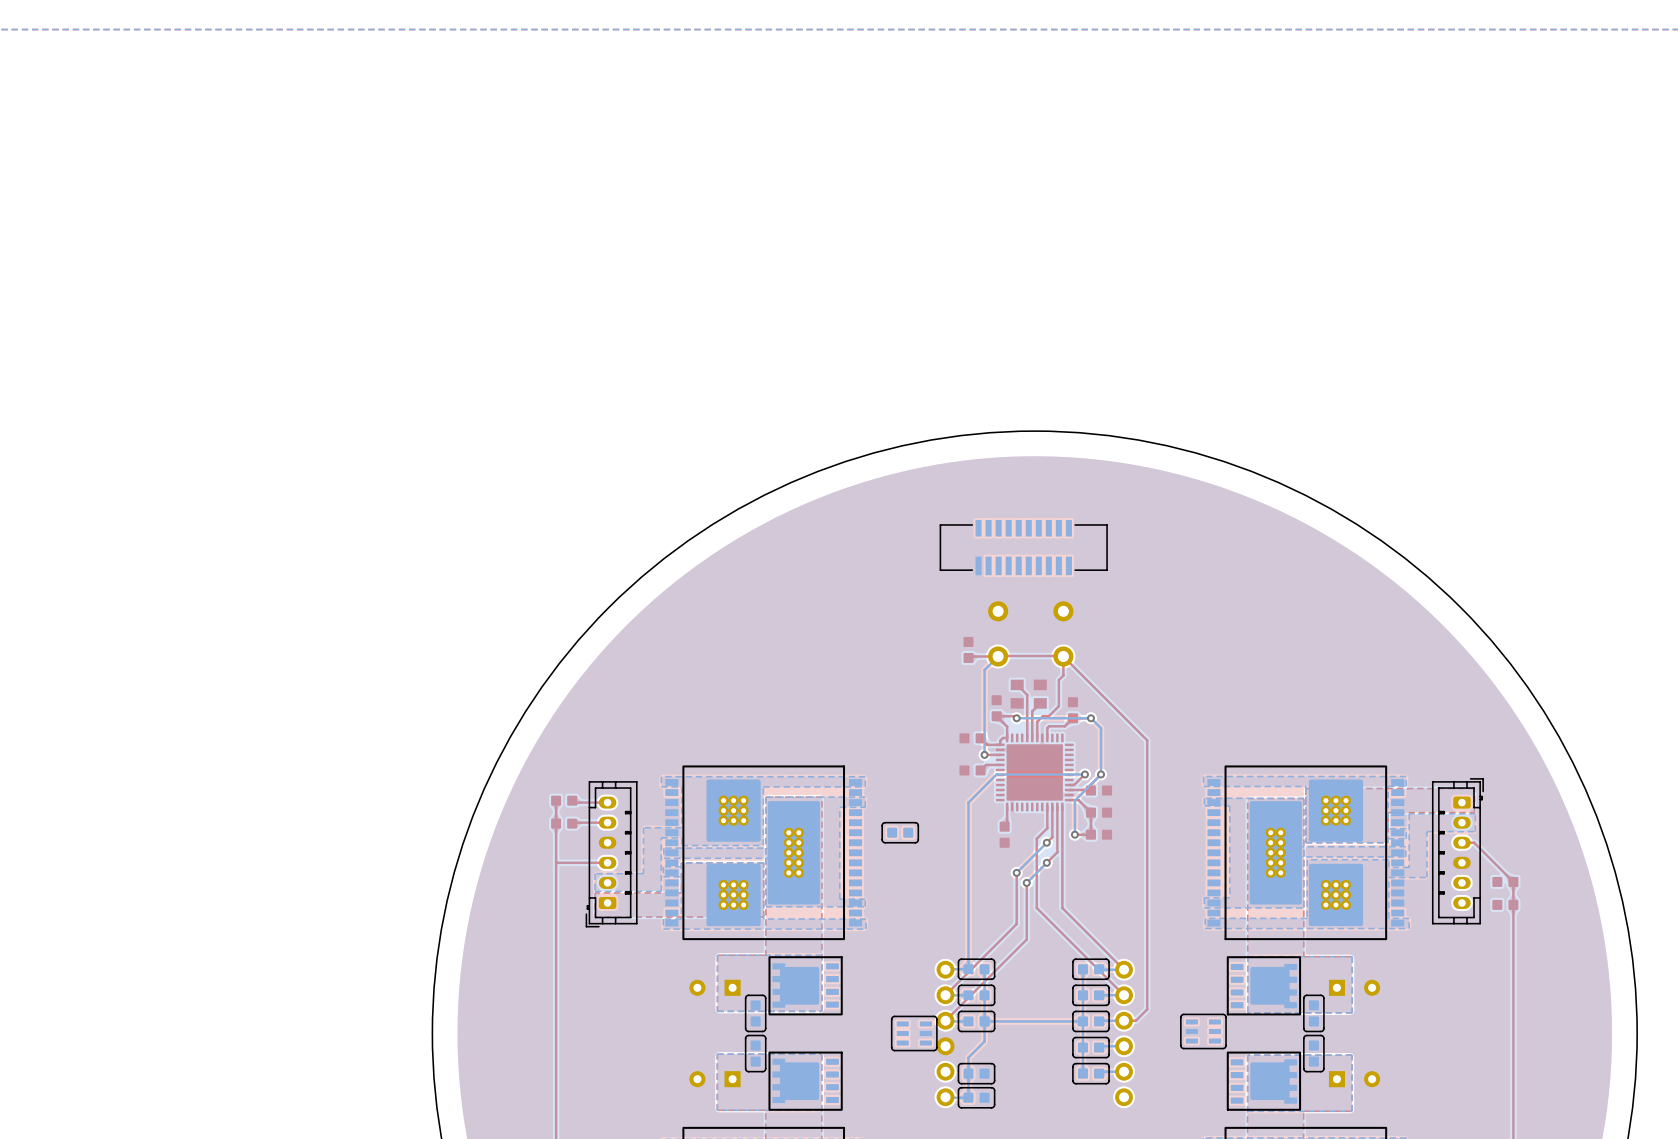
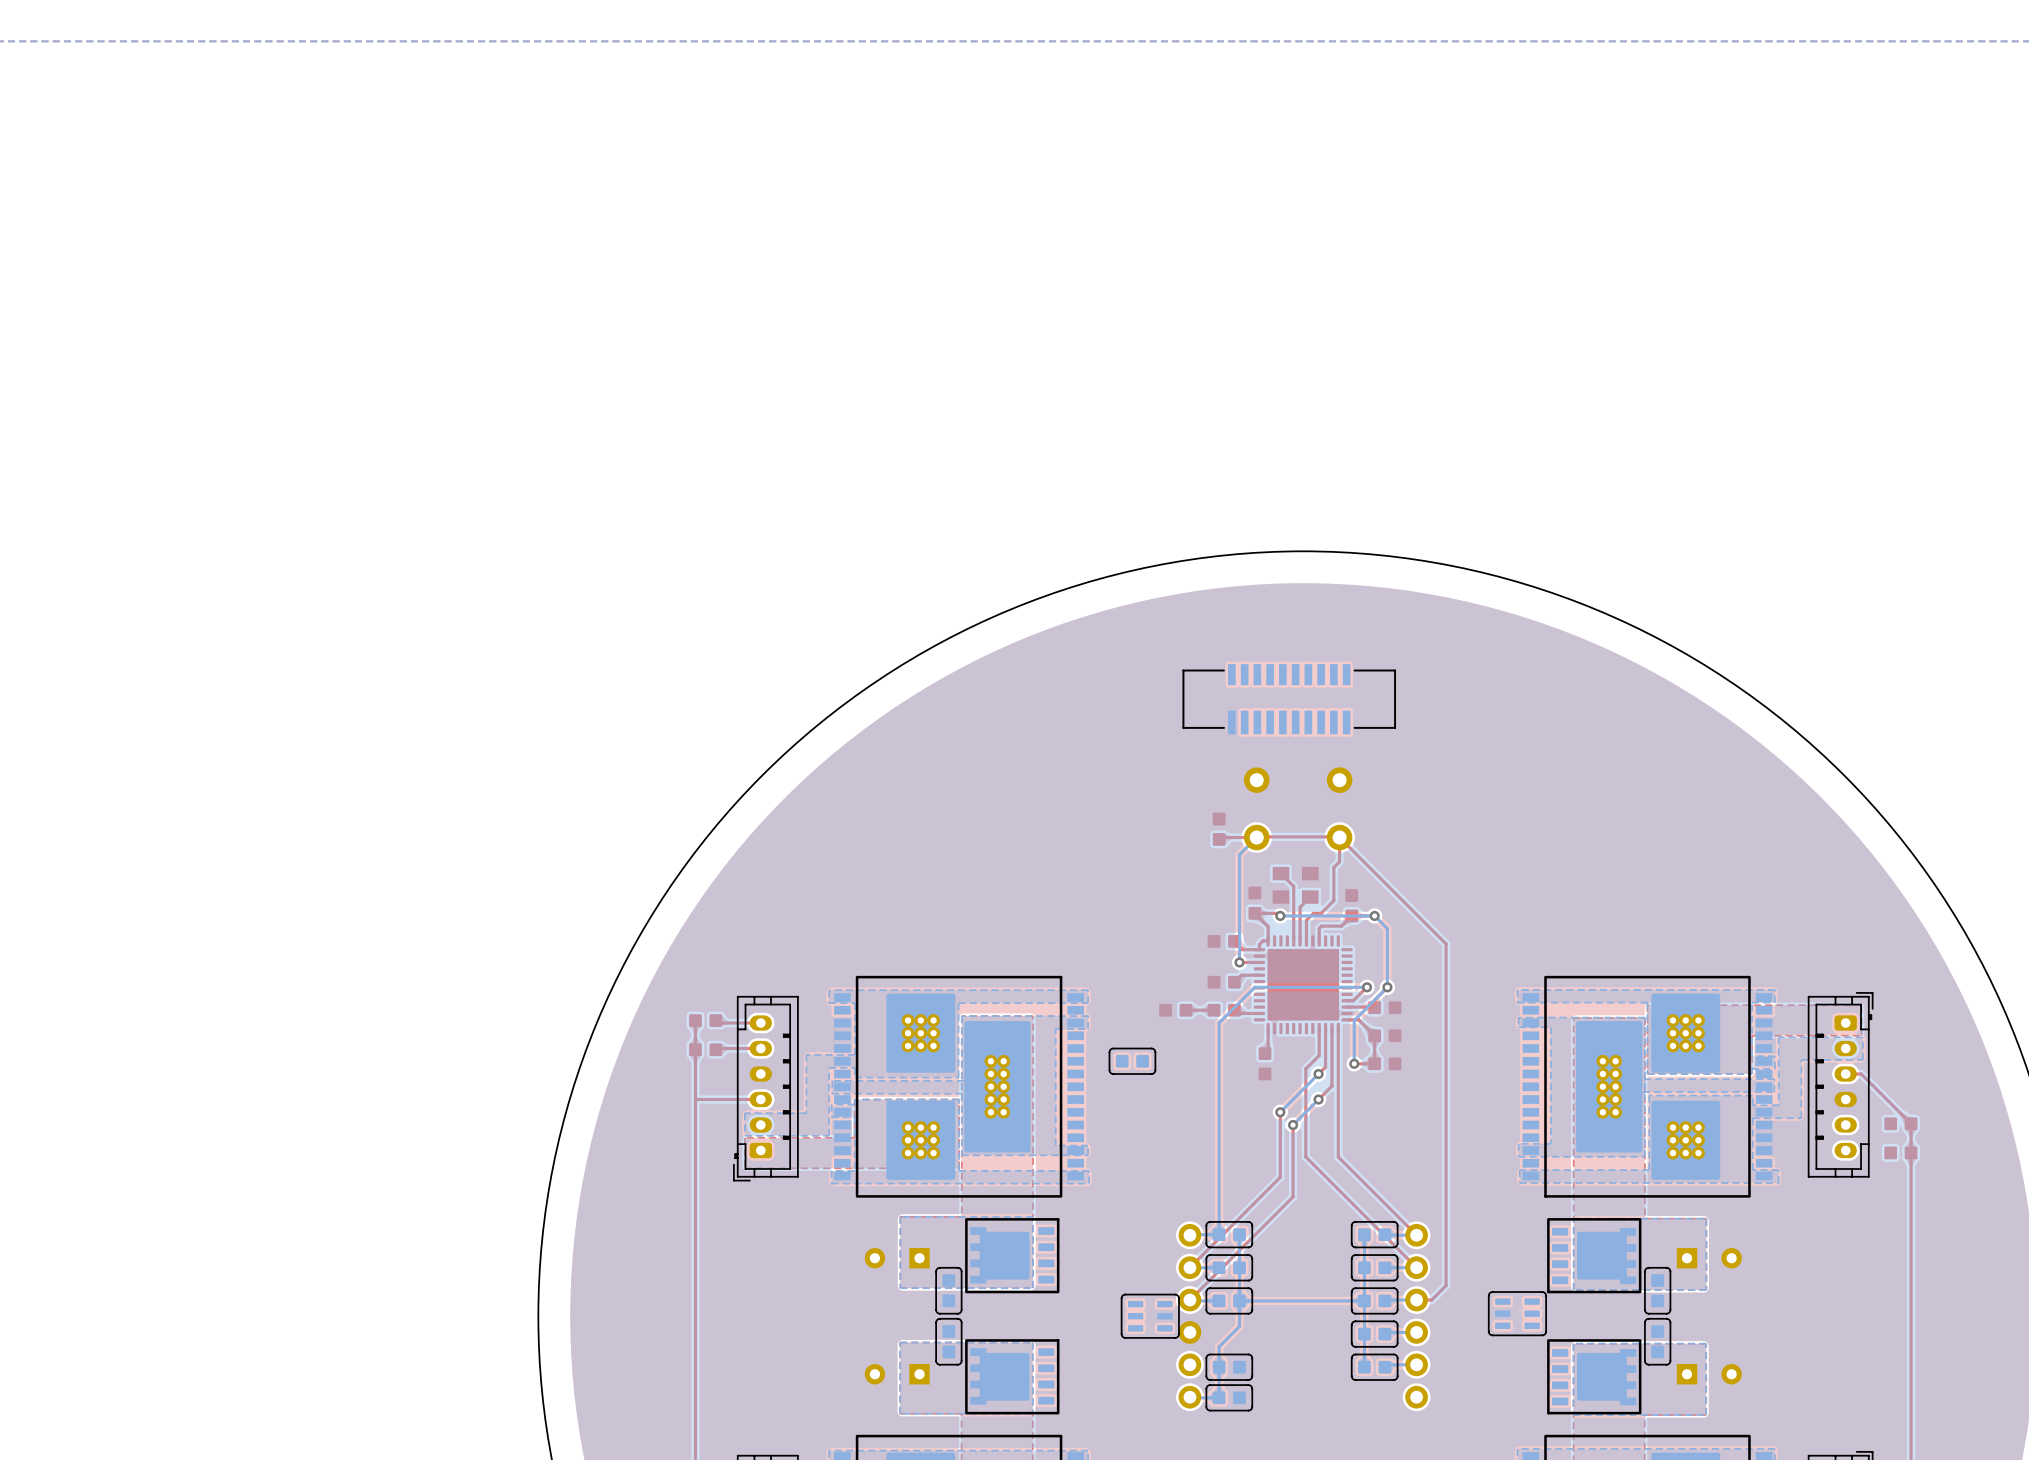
part: none -> (1175, 1010)
top track: none -> (1214, 1010) (1185, 1010)
part: none -> (1224, 1010)
top track: none -> (1234, 1010) (1237, 1013) (1259, 1013)

